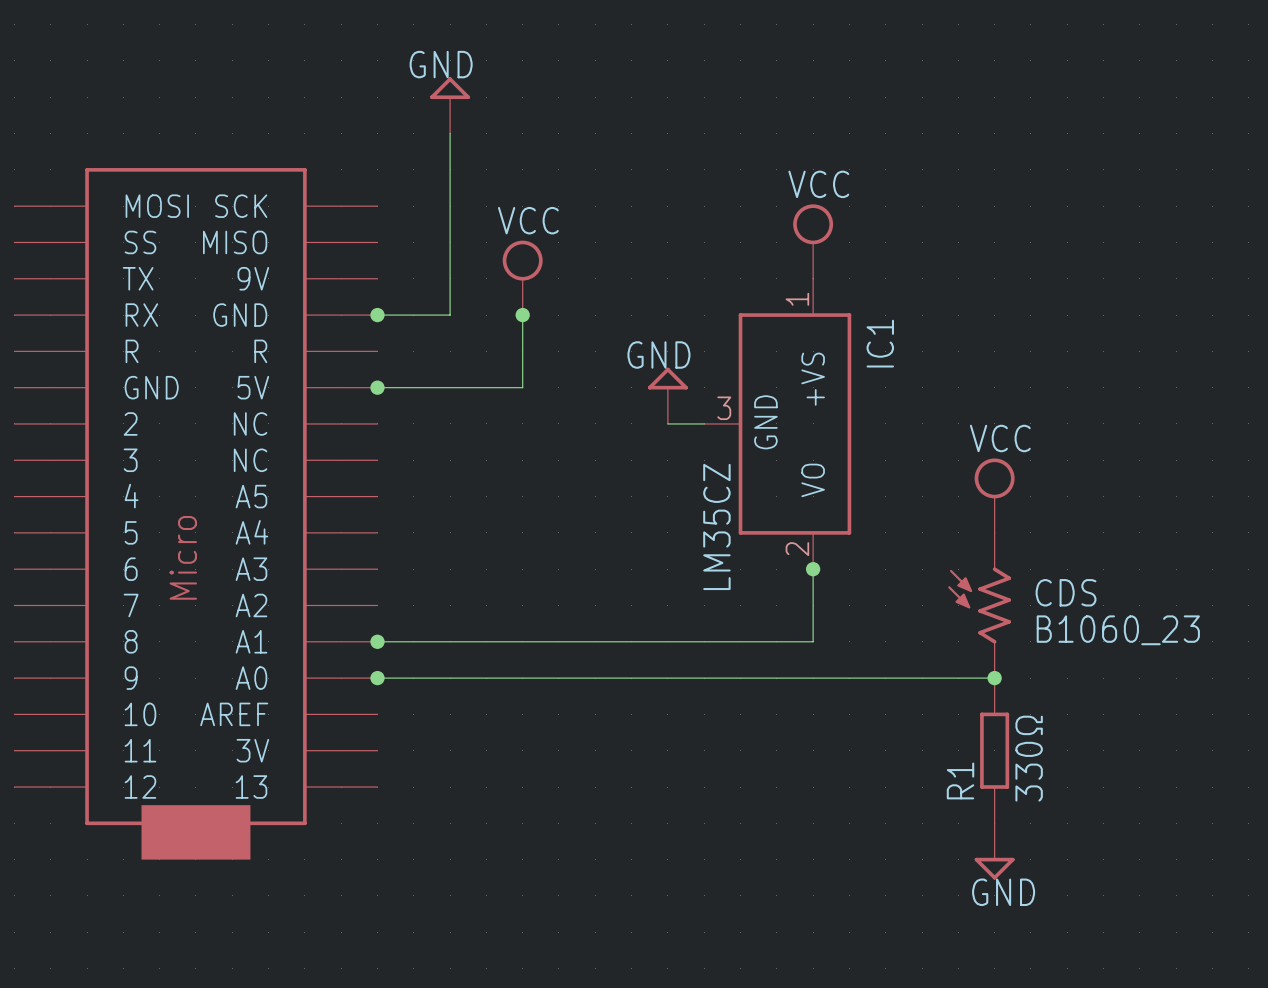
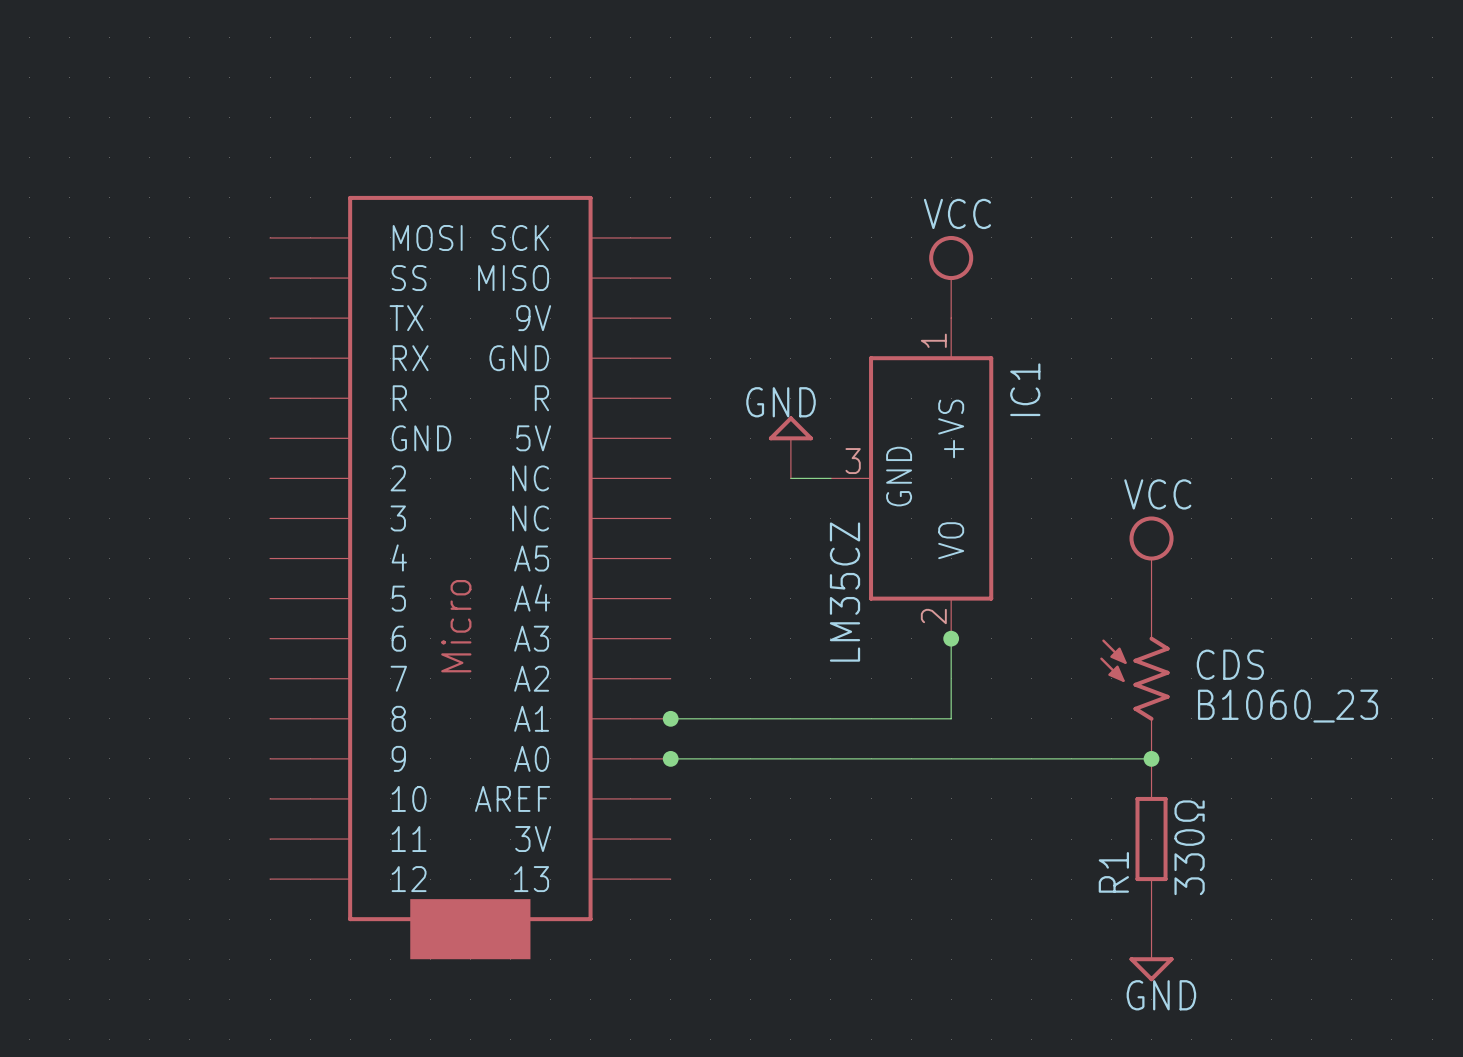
power symbol: GND (450, 105) -> none
wire: (450, 133) (450, 315) (377, 315) -> none
power symbol: VCC (522, 277) -> none
junction: (377, 315) -> none
wire: (522, 315) (522, 387) (377, 387) -> none
junction: (522, 315) -> none
junction: (377, 387) -> none
part position: (195, 513) -> (470, 577)
wire: (377, 641) (558, 641) -> none
junction: (377, 641) -> none
junction: none -> (670, 718)
wire: (377, 678) (558, 678) -> none
junction: (377, 678) -> none
junction: none -> (670, 758)

